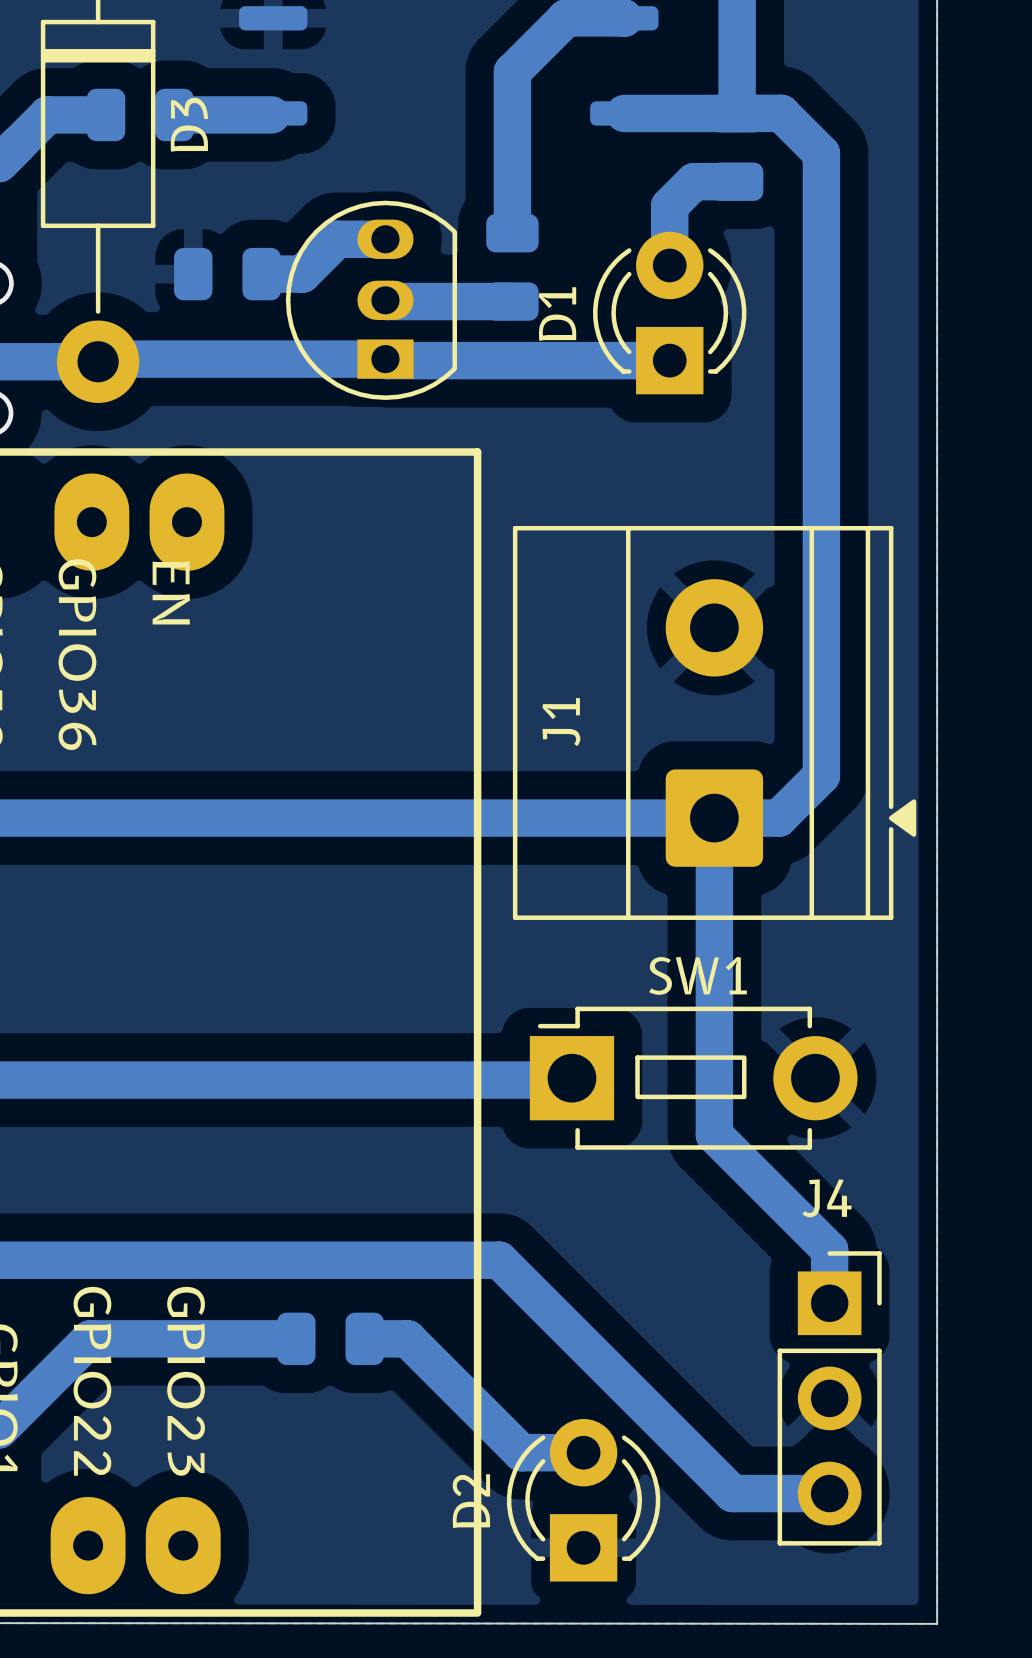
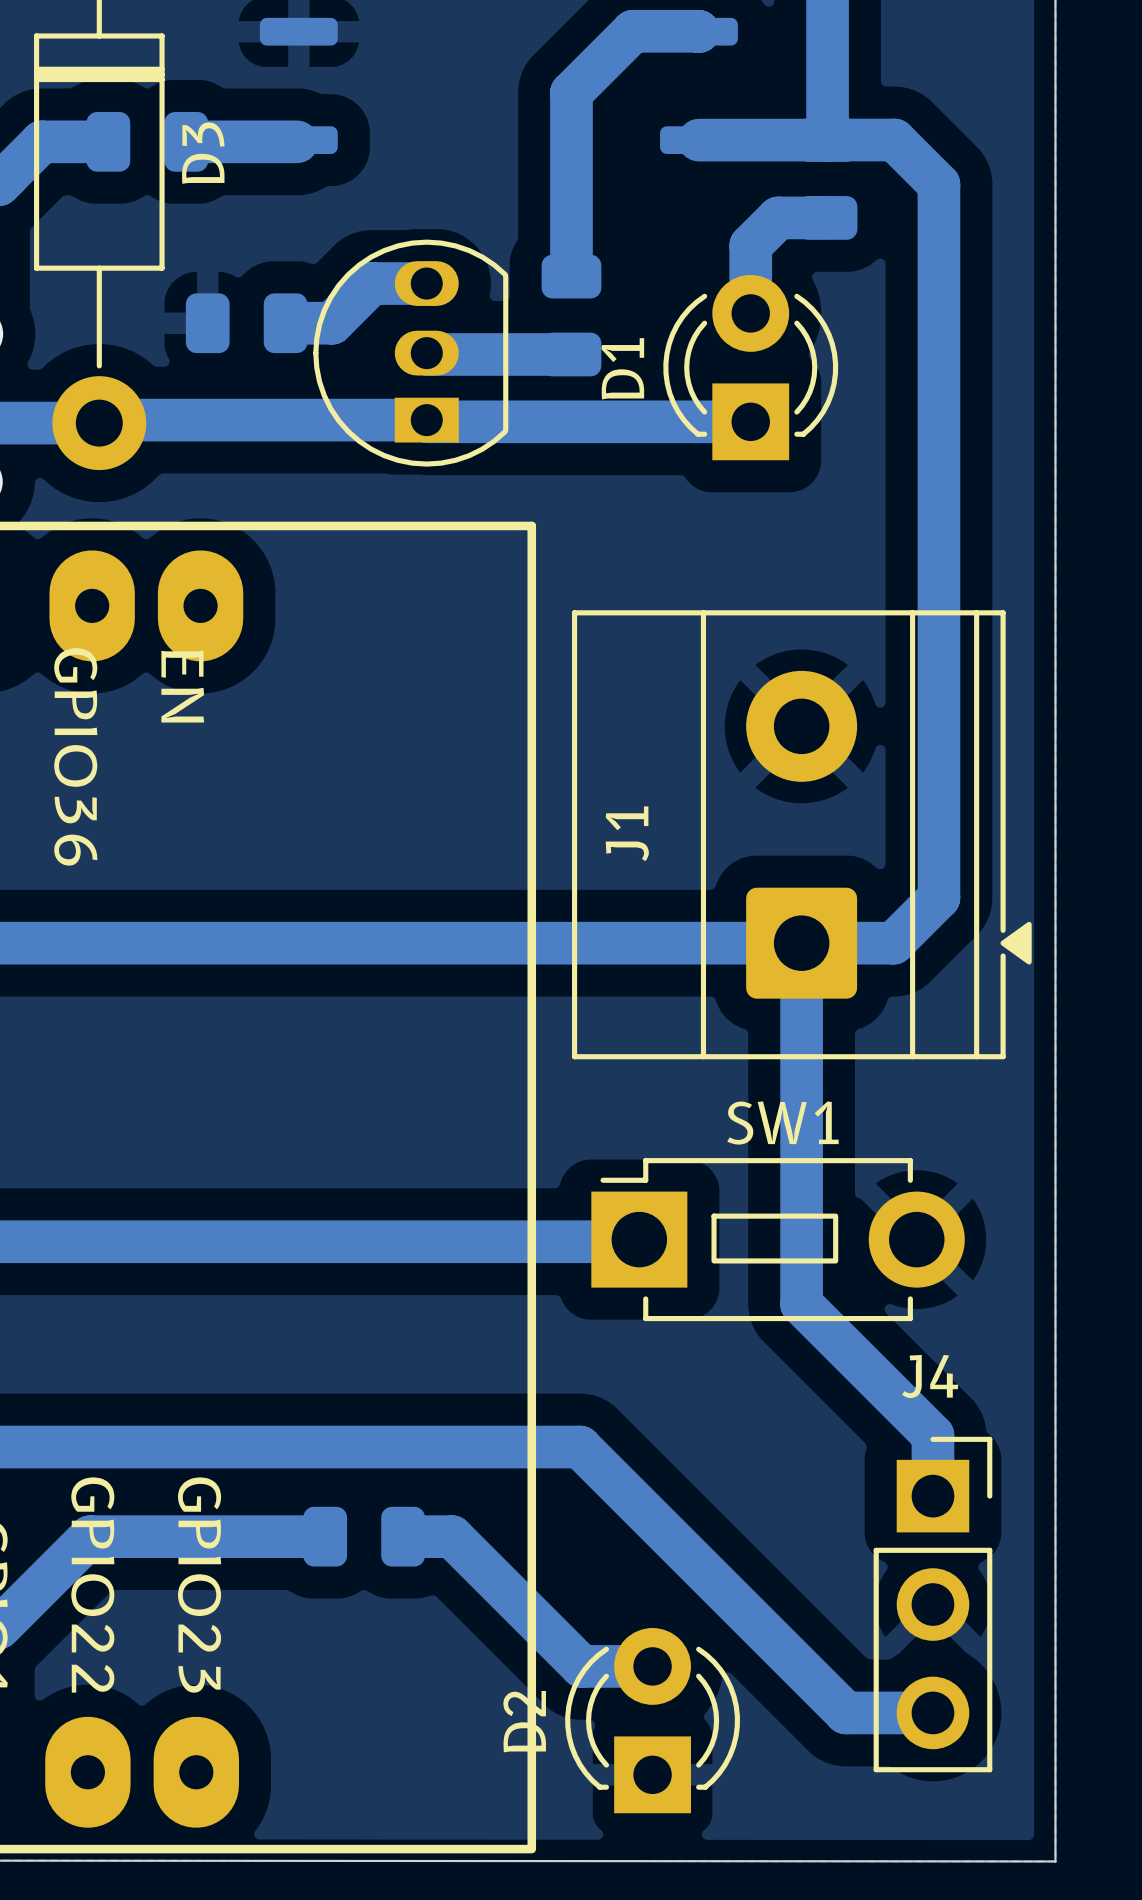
bottom track: (781, 113) (821, 153) (821, 775) (778, 818) -> (877, 140) (894, 140) (938, 184) (938, 897) (893, 943) (875, 943)
bottom track: (499, 1260) (732, 1493) (753, 1493) -> (556, 1447) (580, 1447) (845, 1712)

